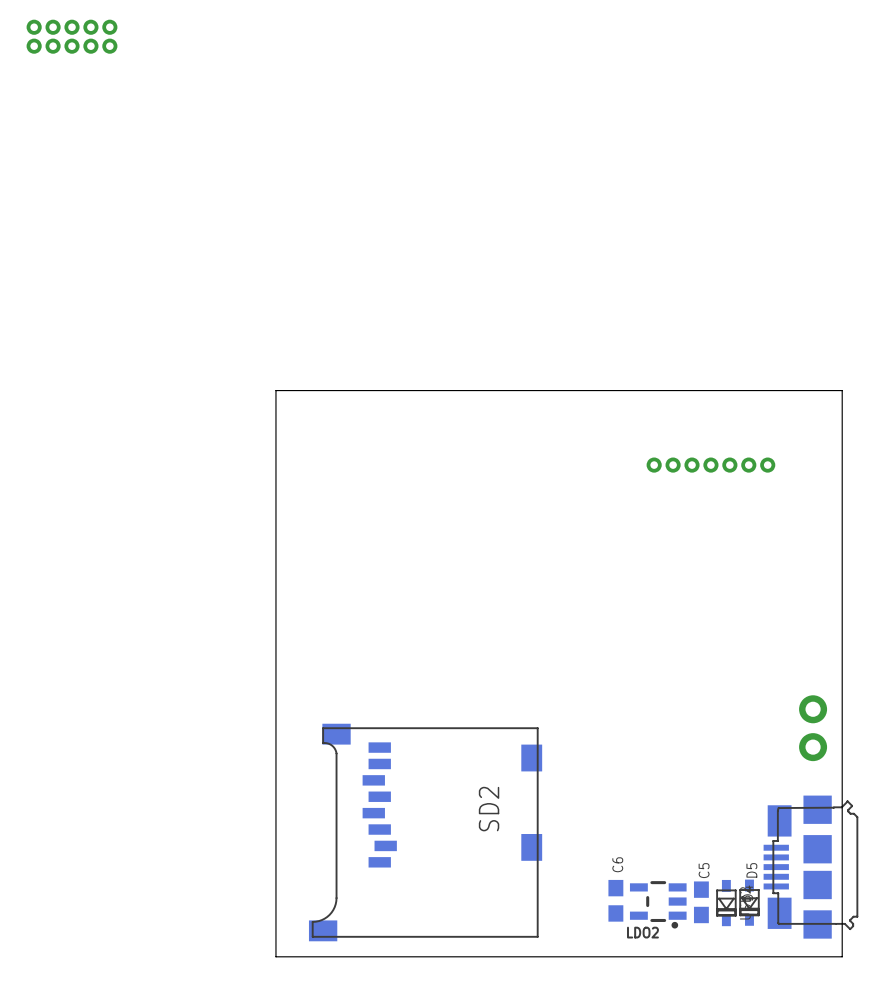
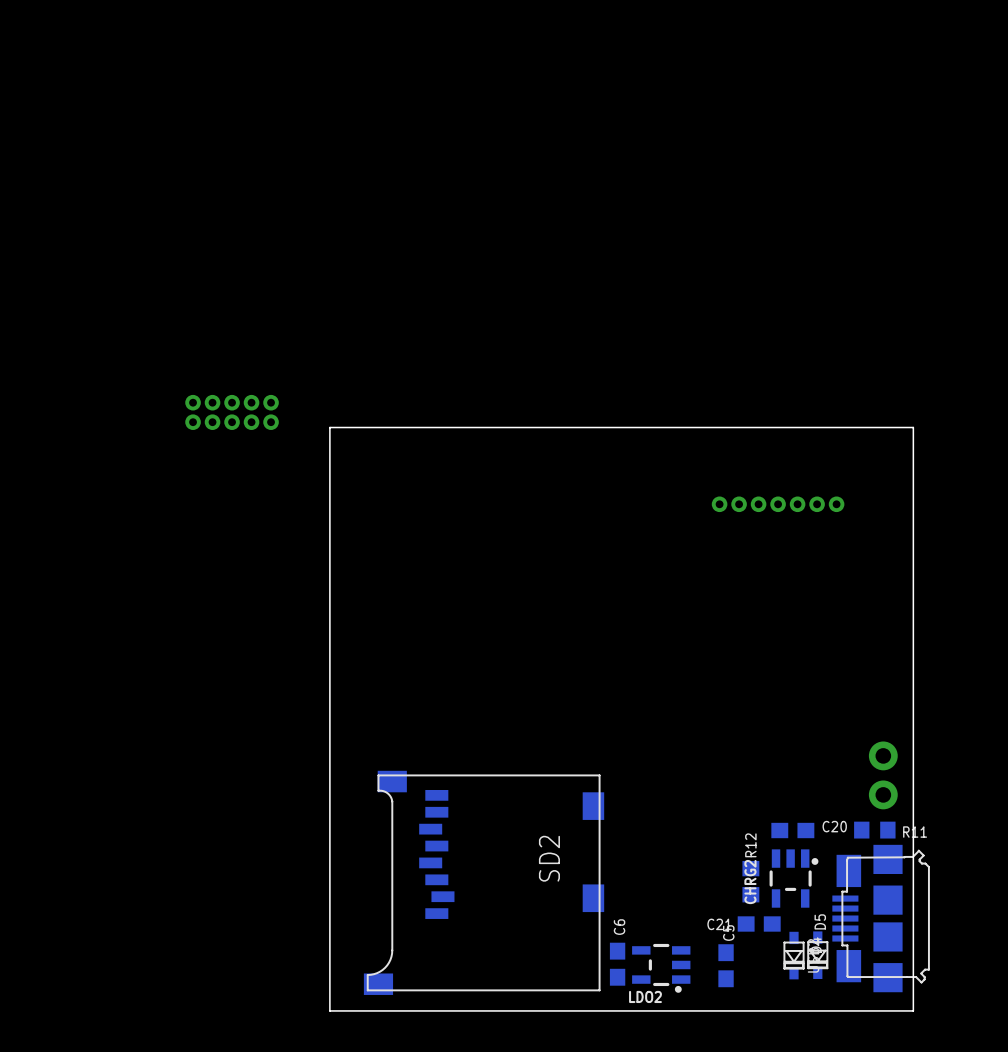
part position: (71, 36) -> (232, 412)
C20: none -> (792, 830)
R11: none -> (874, 830)
CHRG2: none -> (793, 878)
R12: none -> (750, 881)
C21: none -> (759, 923)
C6 position: (615, 900) -> (617, 964)
C5 position: (701, 902) -> (726, 965)
LDO2 position: (658, 904) -> (661, 968)

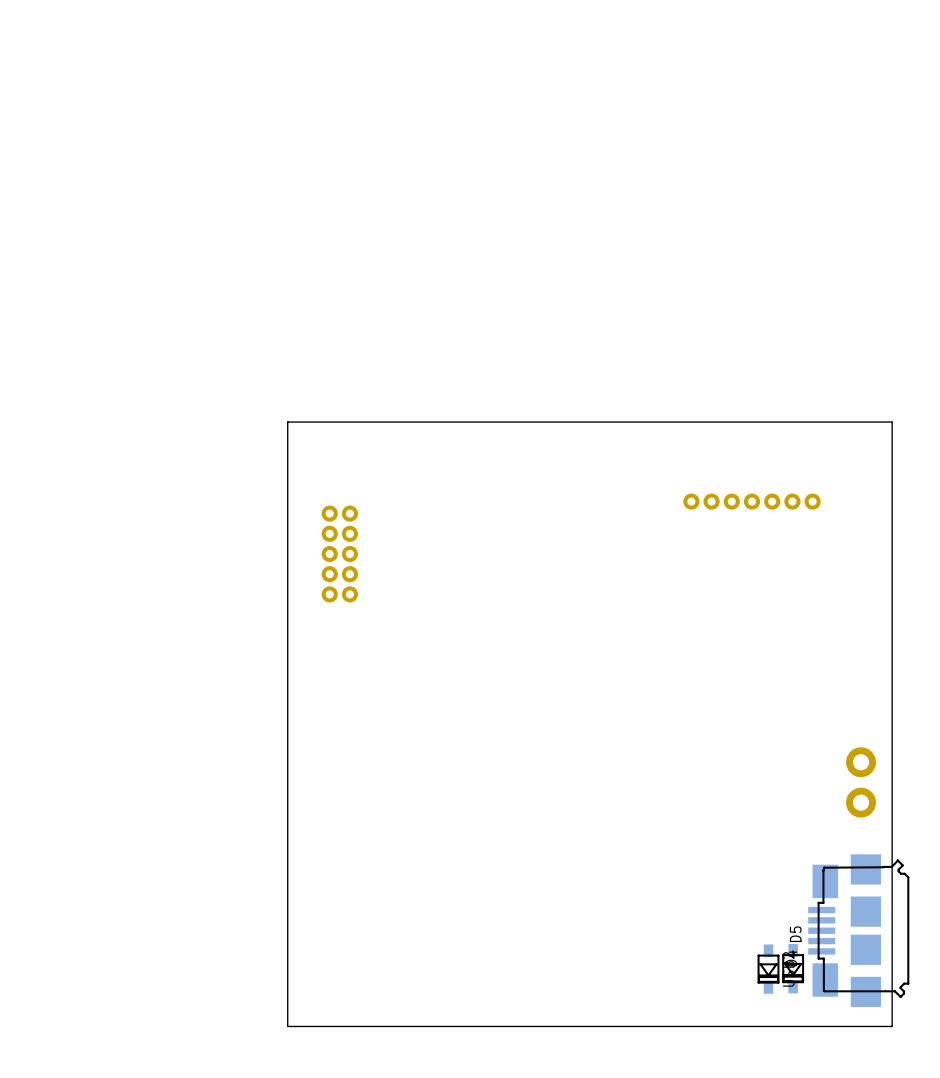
part rotation: 0° (232, 412) -> 90° clockwise (339, 554)
part position: (232, 412) -> (339, 554)
C20: (792, 830) -> none
R11: (874, 830) -> none
CHRG2: (793, 878) -> none
R12: (750, 881) -> none
SD2: (484, 882) -> none
C21: (759, 923) -> none
C6: (617, 964) -> none
C5: (726, 965) -> none
LDO2: (661, 968) -> none

